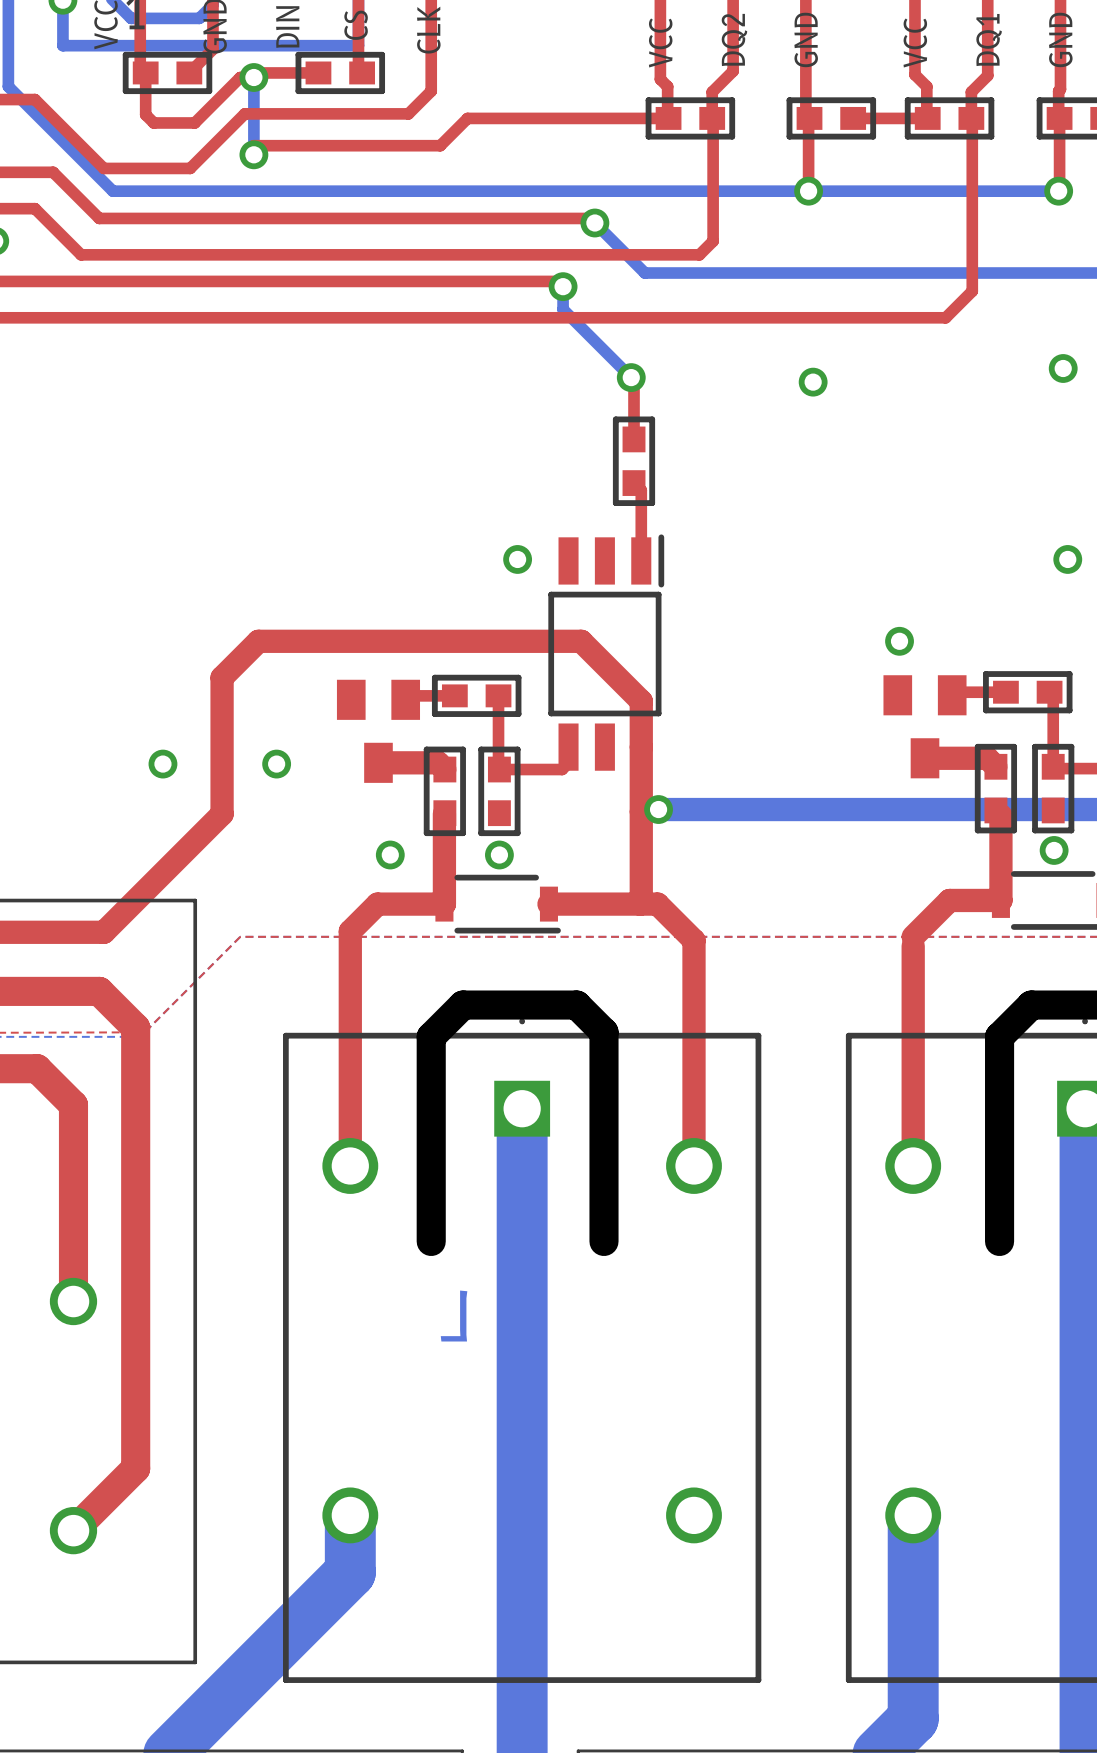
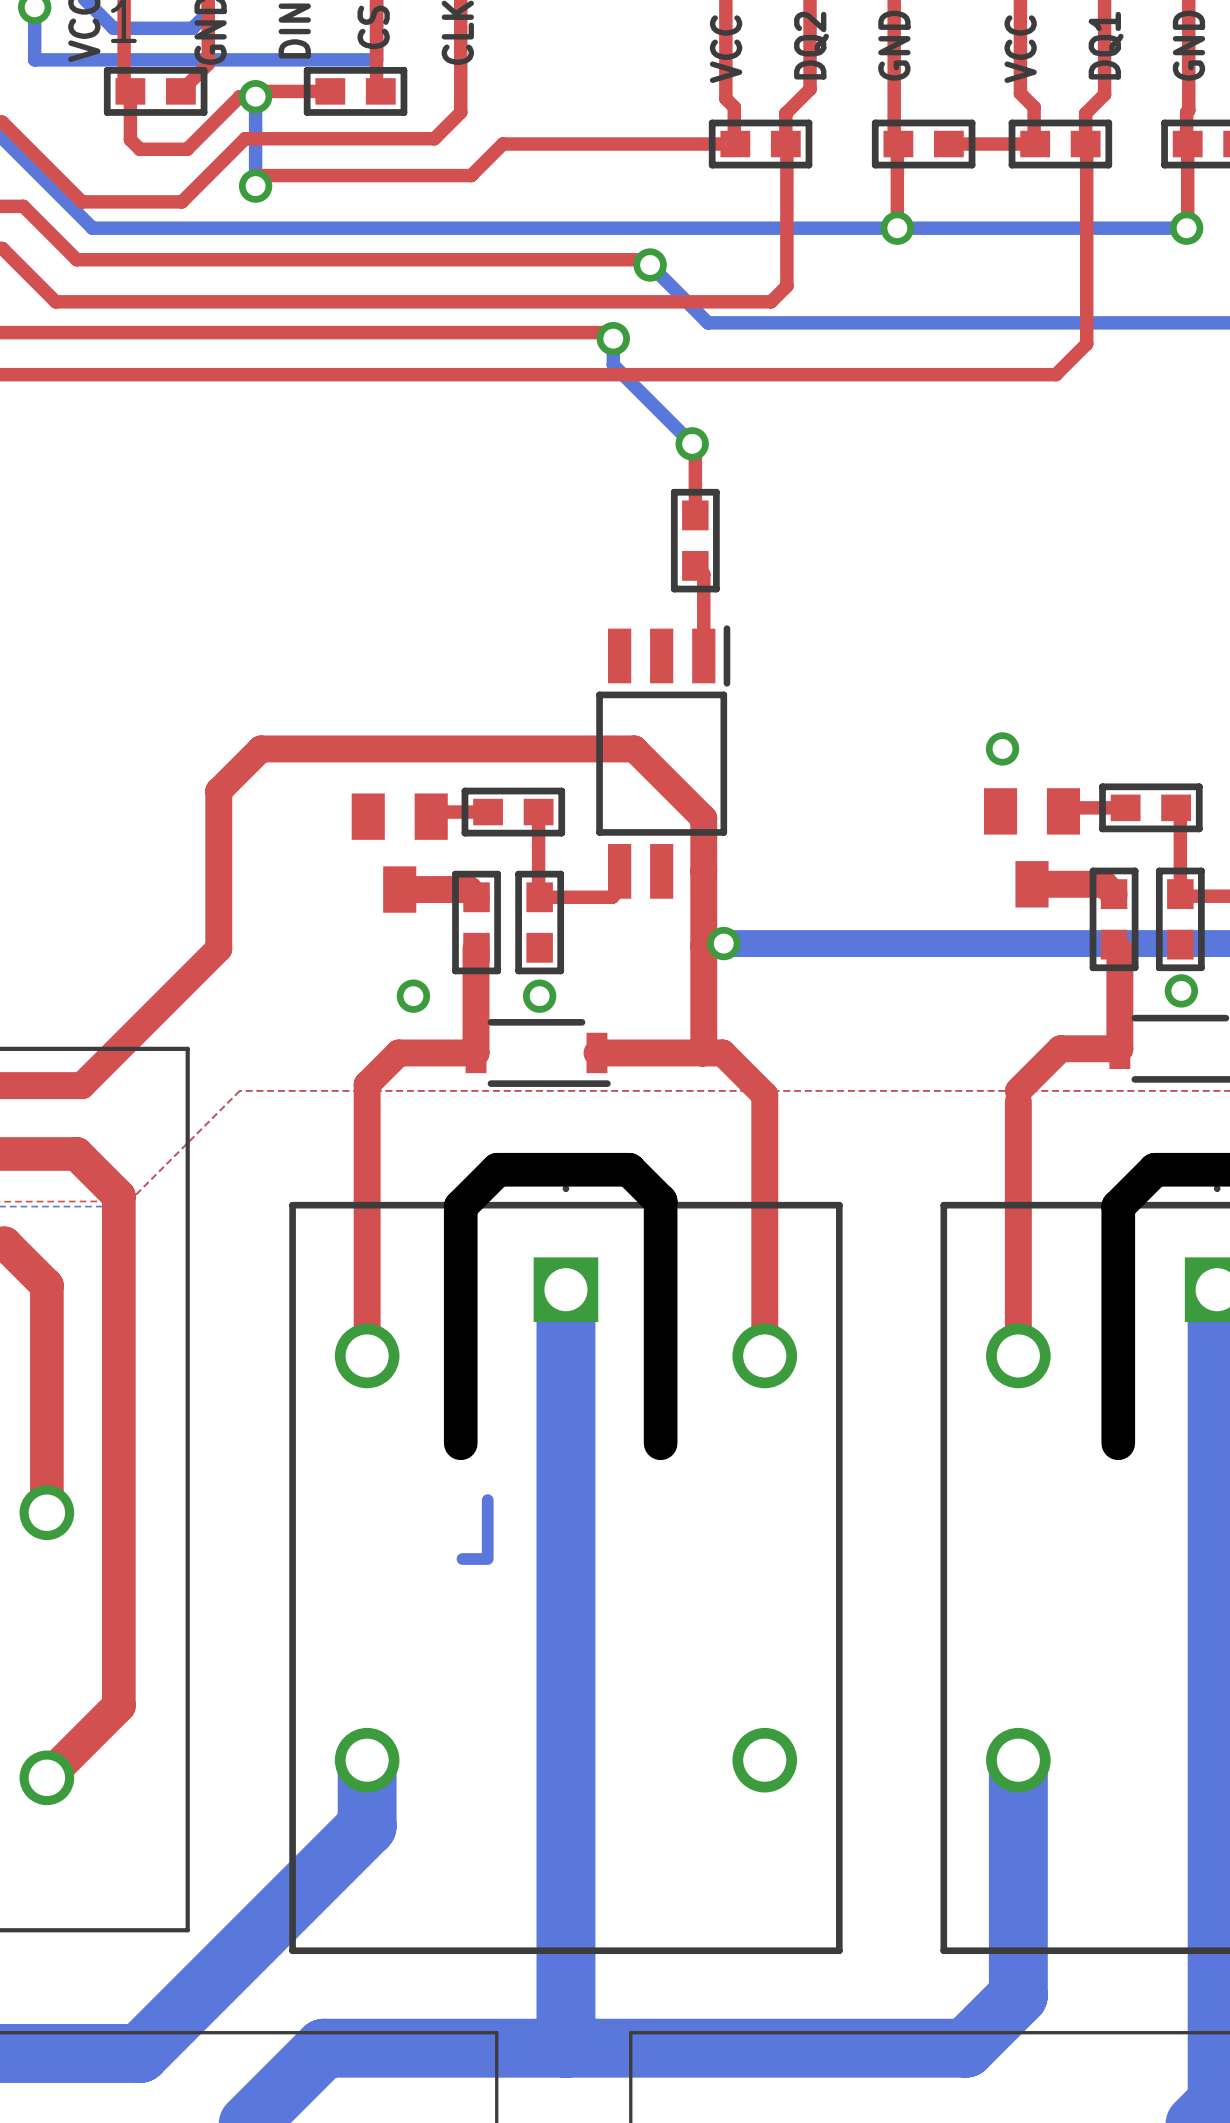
via: (1063, 368) -> none
via: (813, 382) -> none
via: (517, 559) -> none
via: (1067, 559) -> none
via: (162, 764) -> none
via: (276, 764) -> none

